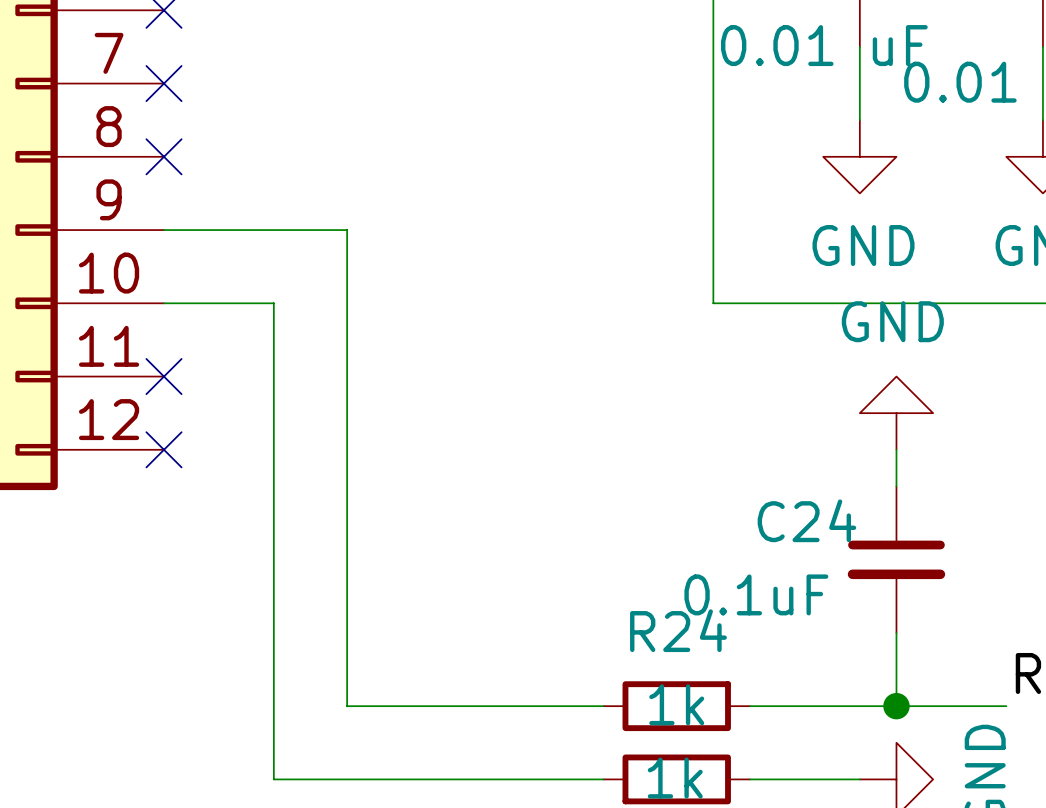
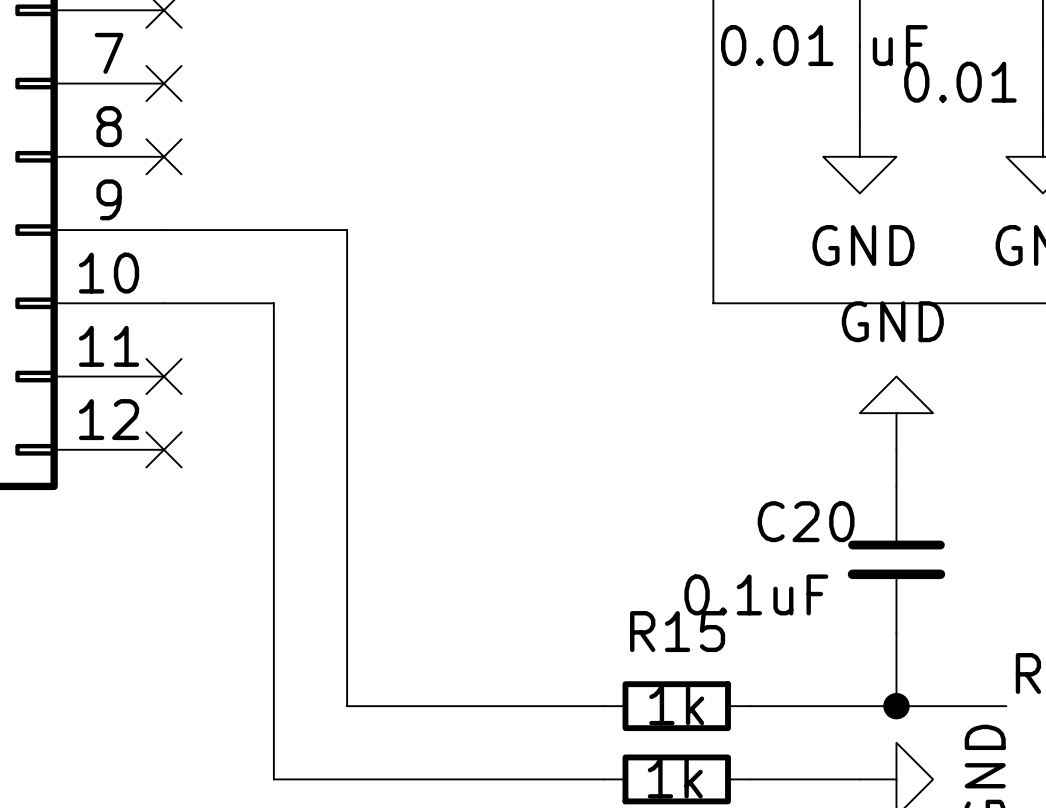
C24 name: C24 (806, 520) -> C20 (806, 521)
R24 name: R24 (678, 630) -> R15 (677, 631)

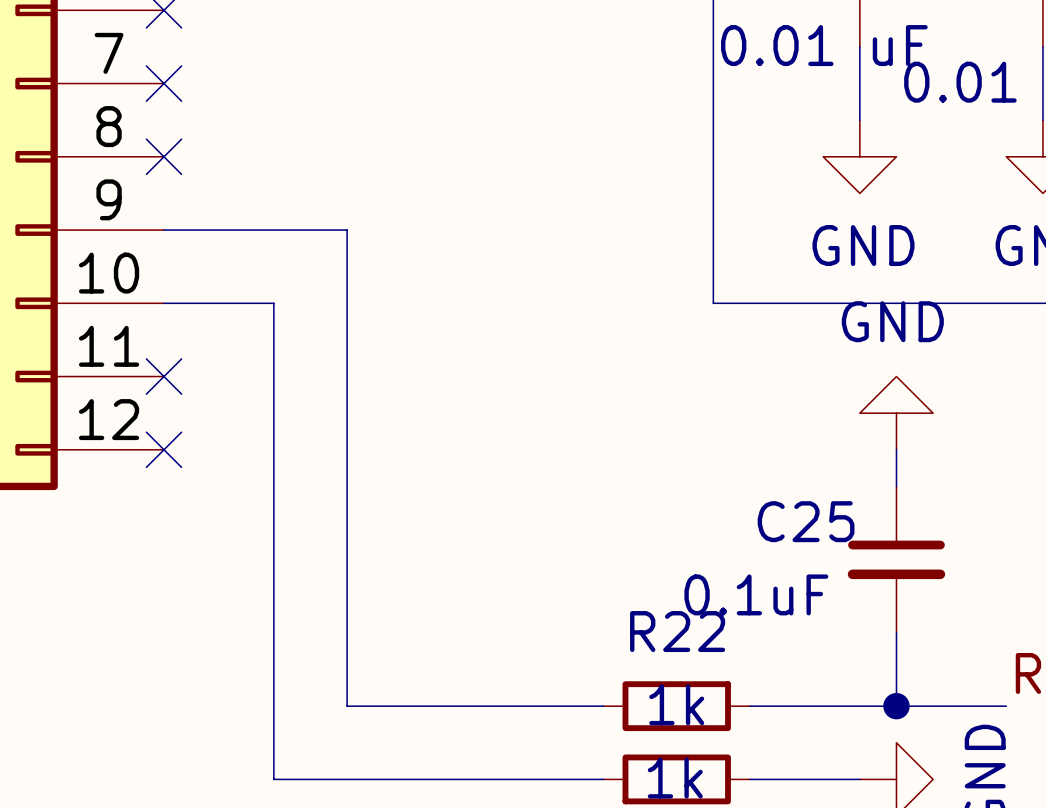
C20 name: C20 (806, 521) -> C25 (806, 521)
R15 name: R15 (677, 631) -> R22 (677, 631)

